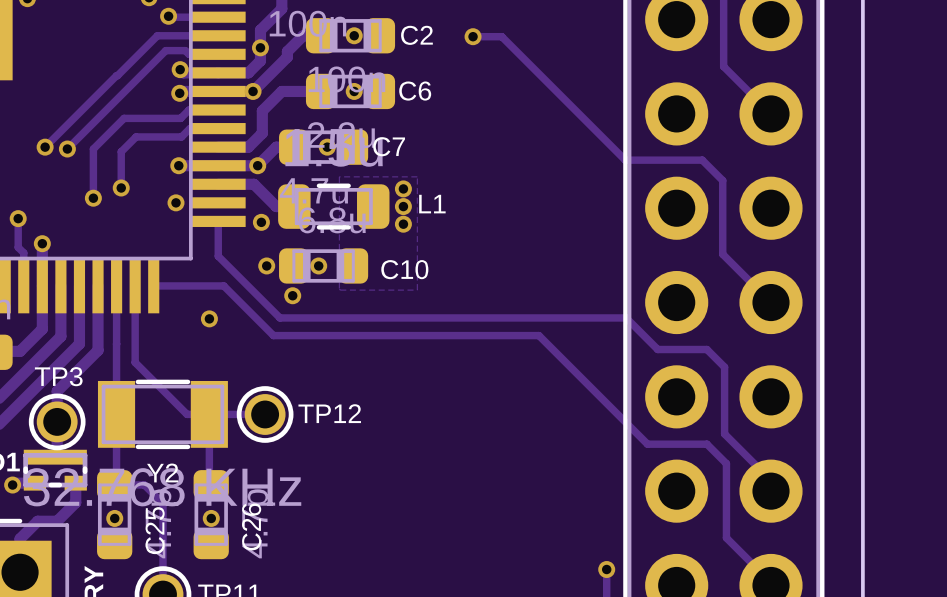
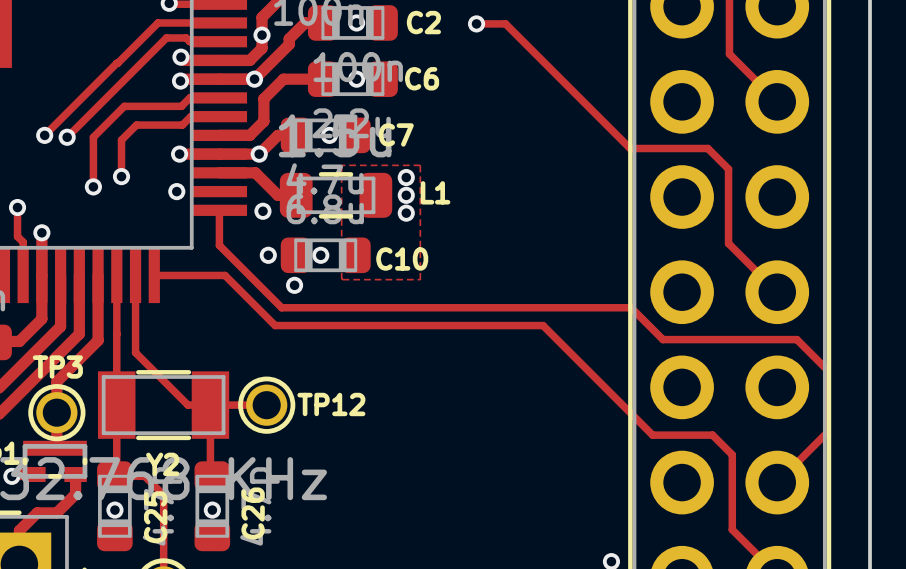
via: (209, 318) -> none
track: (706, 349) (724, 367) (724, 433) (771, 480) (771, 491) -> (712, 339) (796, 339) (826, 369) (826, 432) (777, 482)

